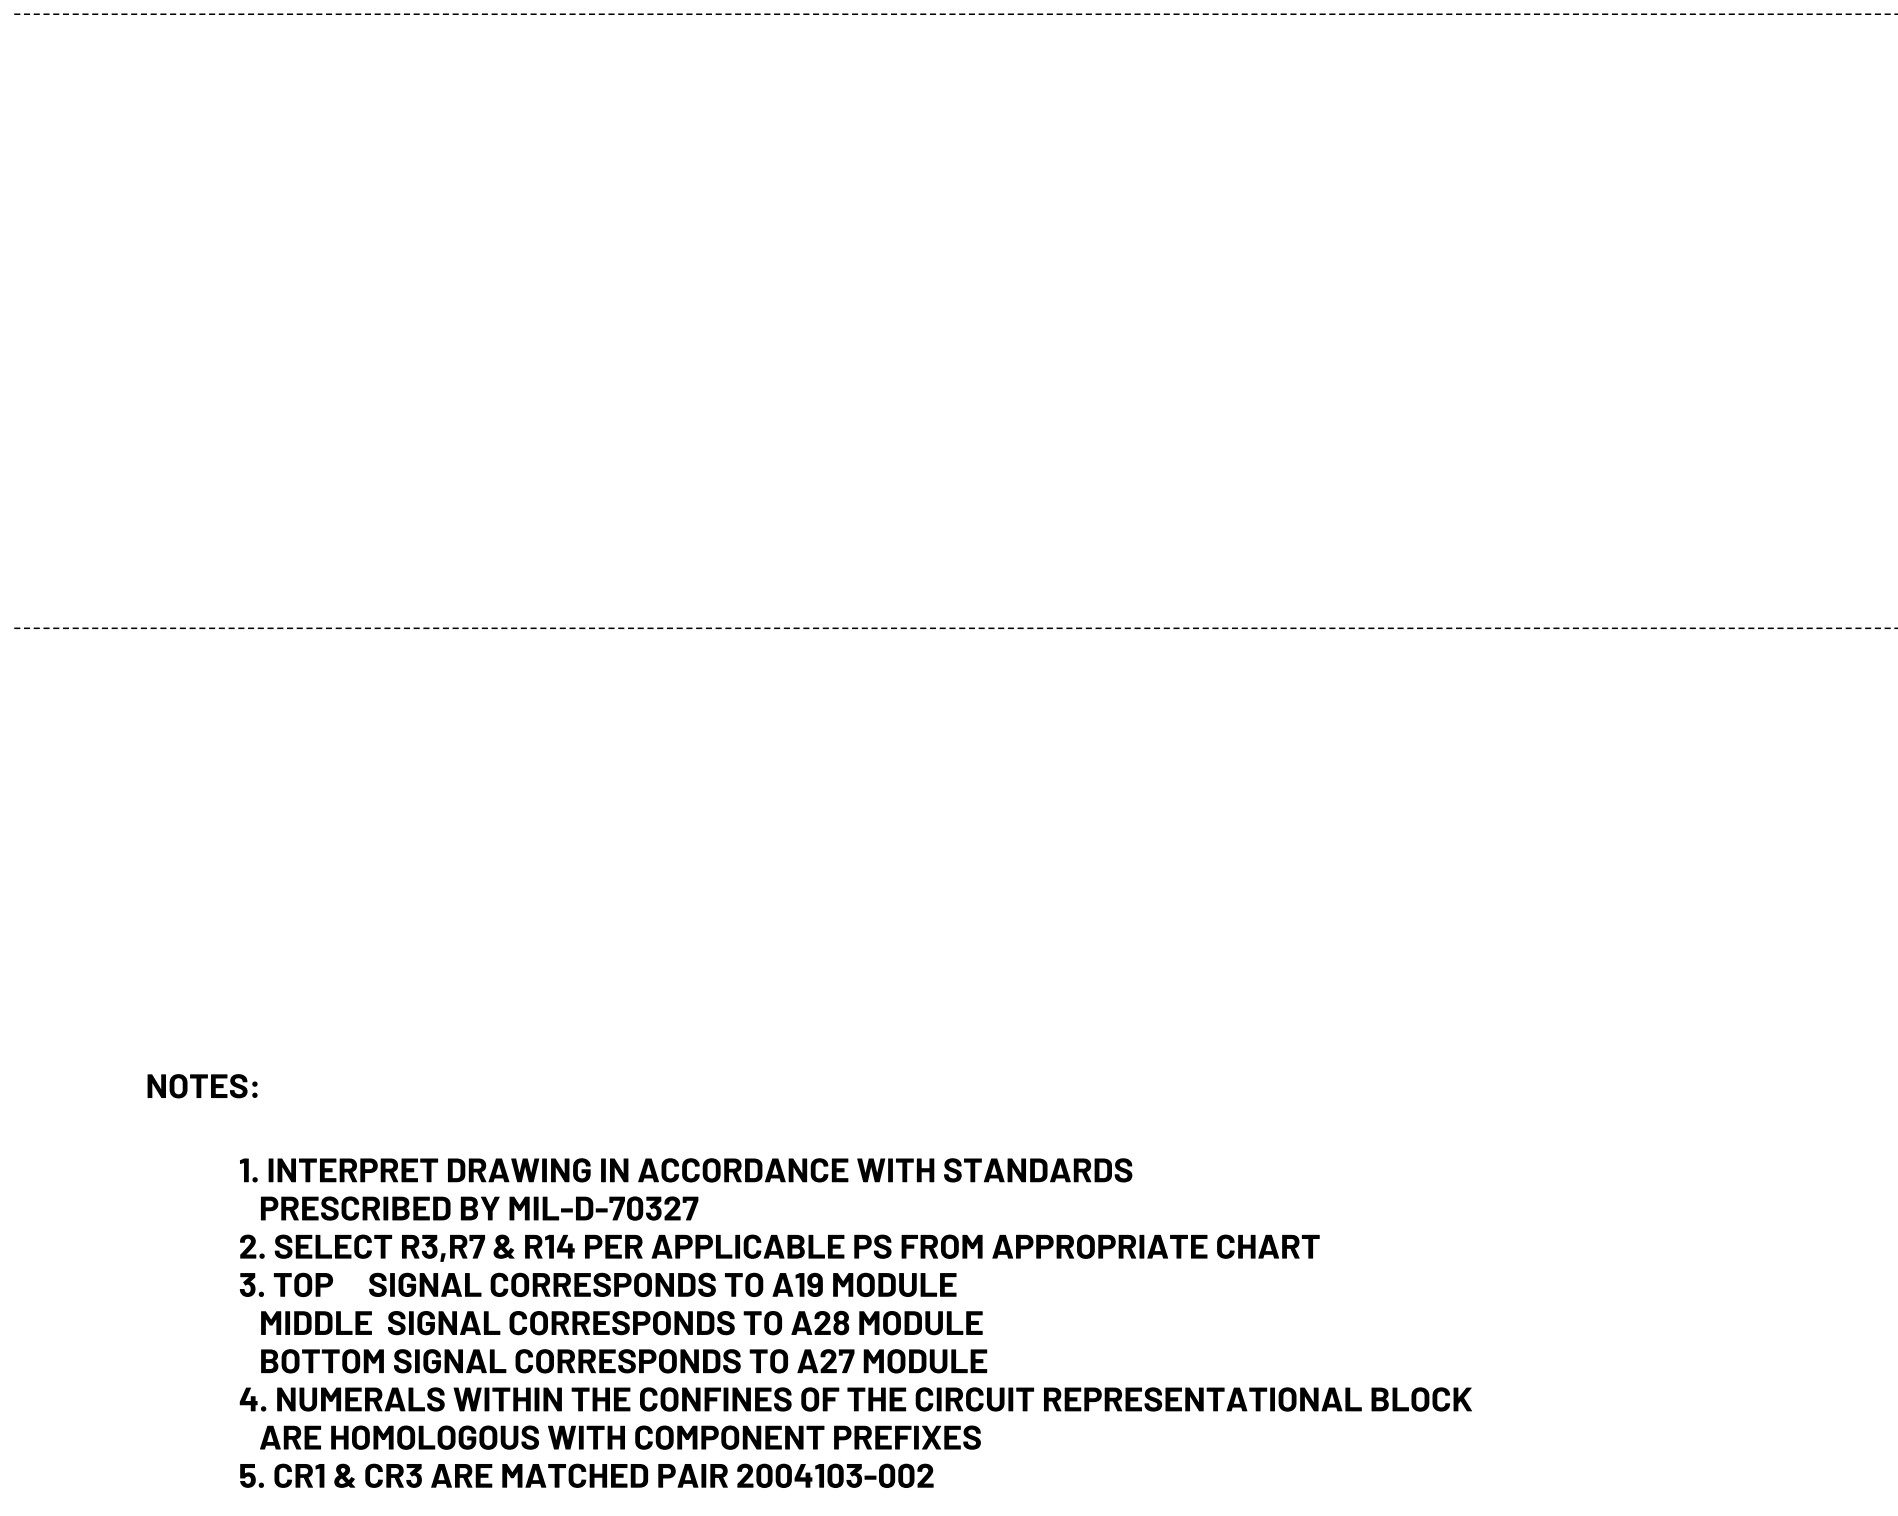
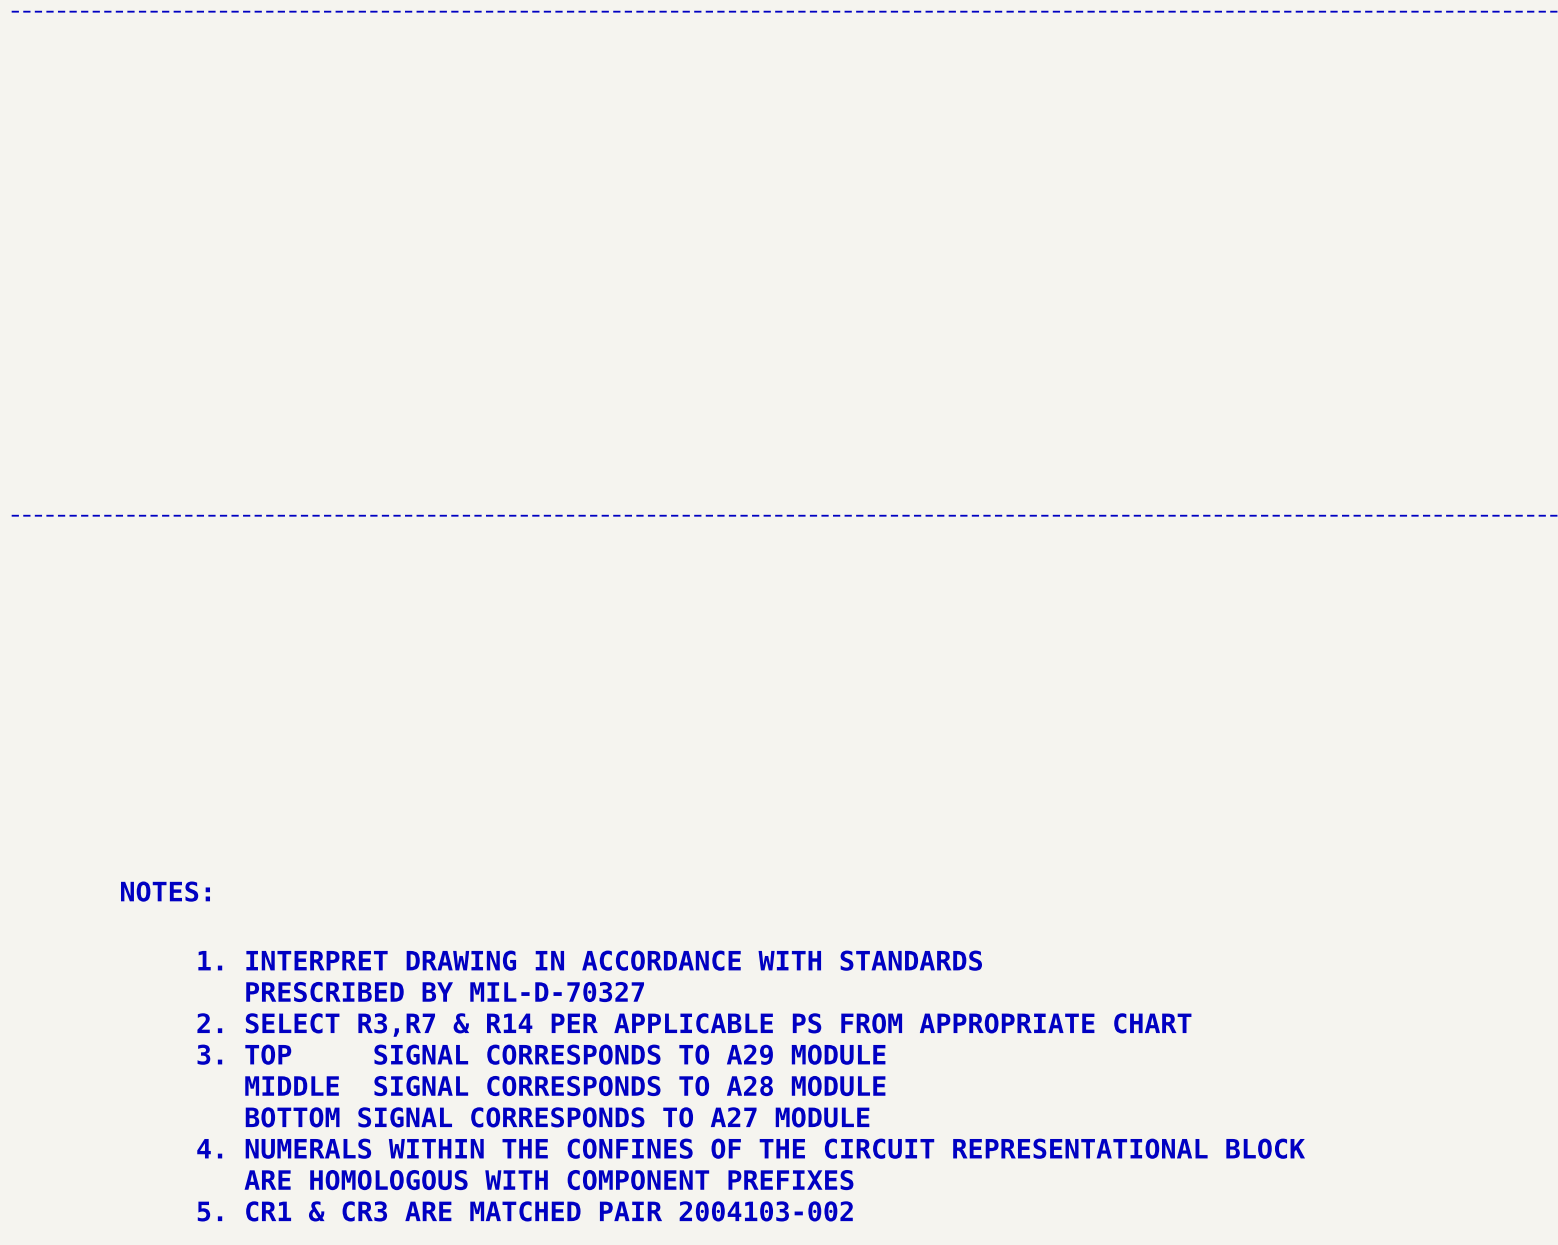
text: 3. TOP SIGNAL CORRESPONDS TO A19 MODULE (598, 1284) -> 3. TOP SIGNAL CORRESPONDS TO A29 MODULE (541, 1054)

